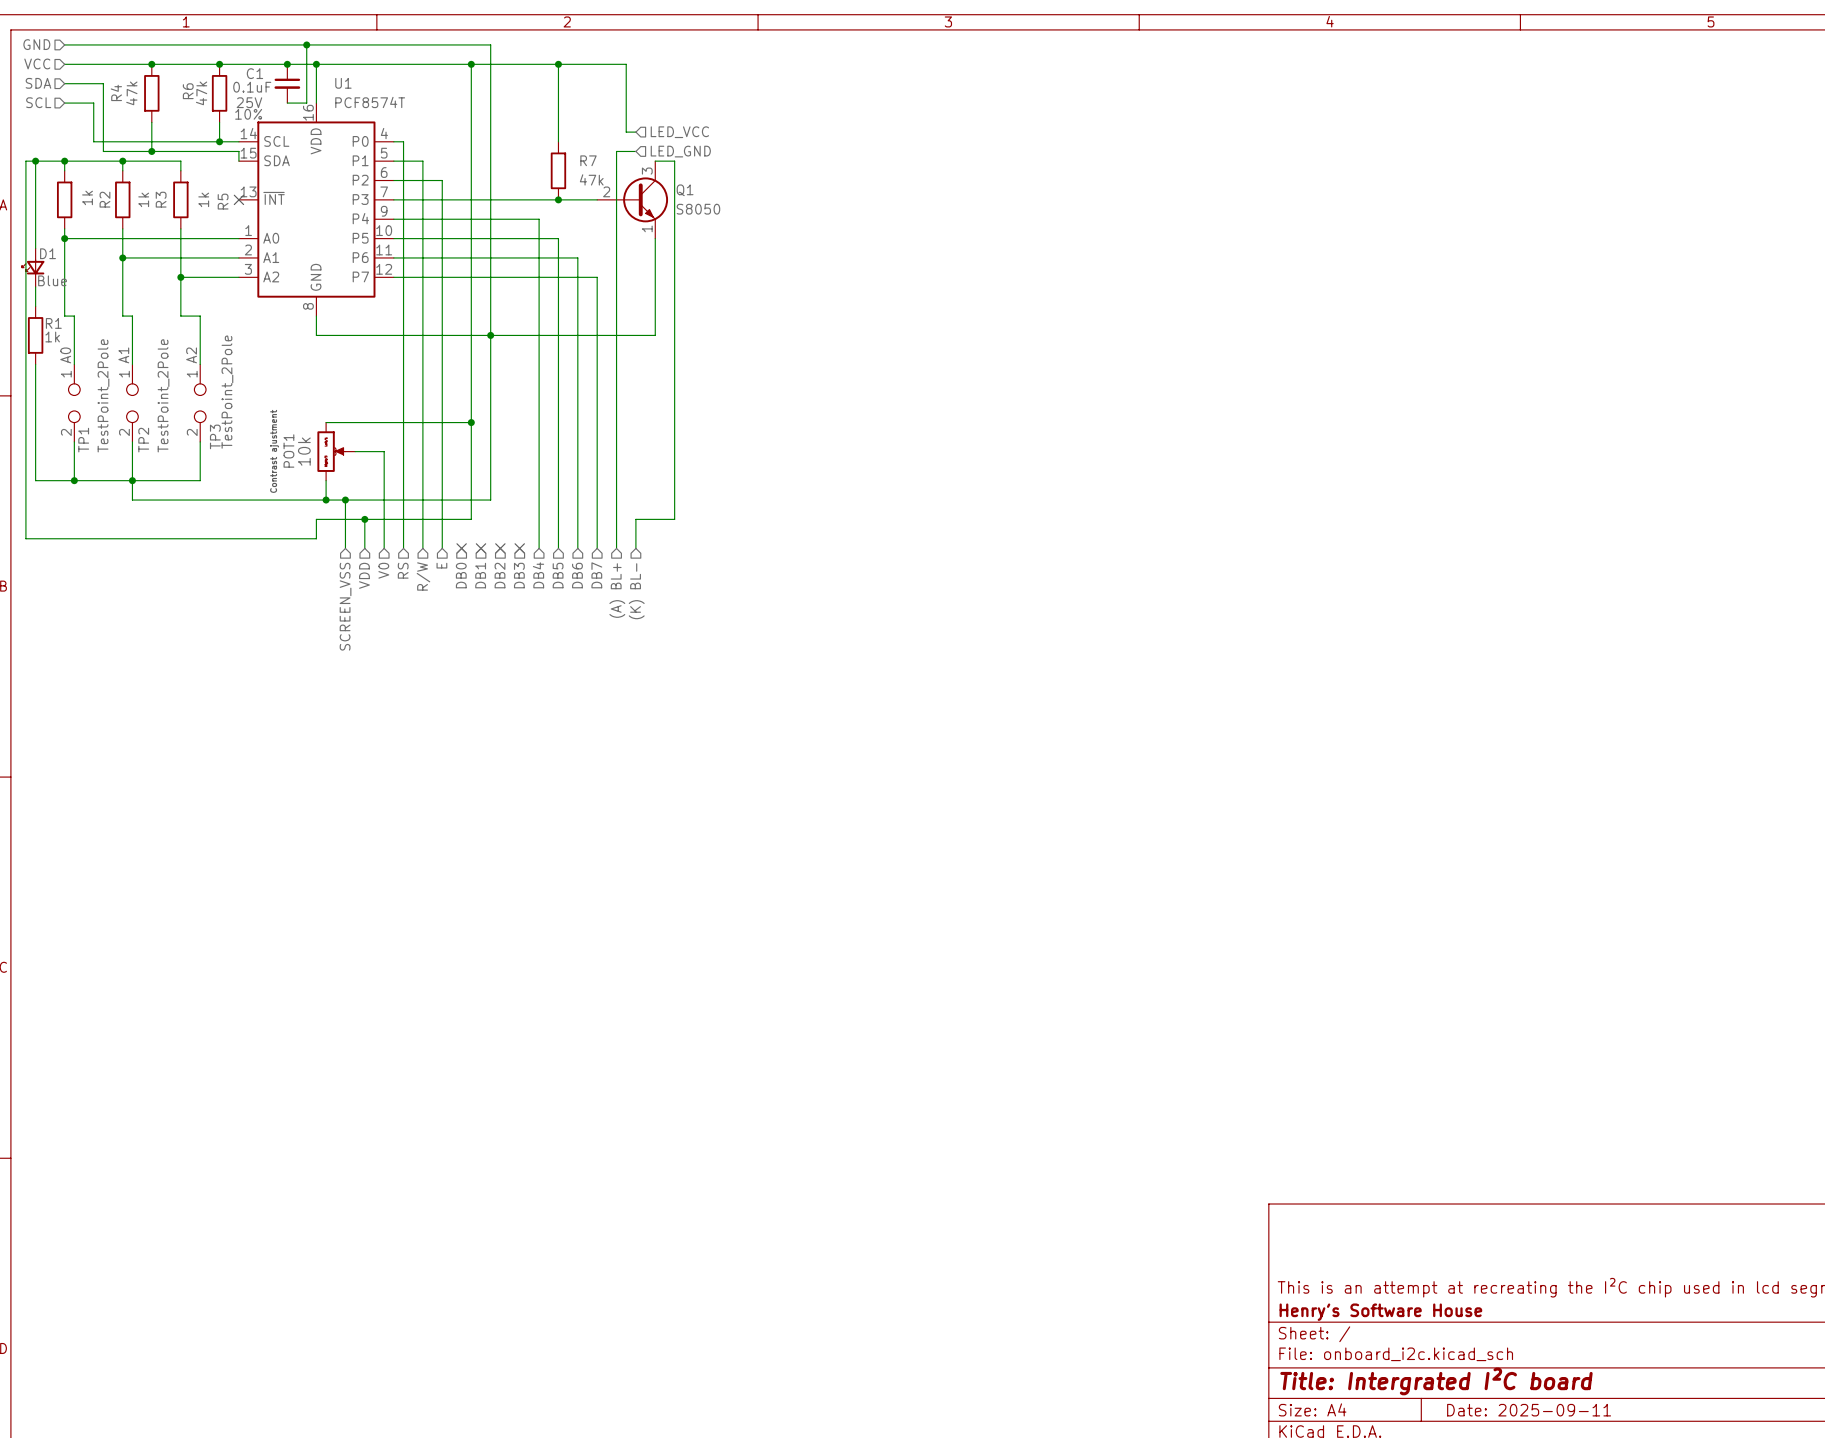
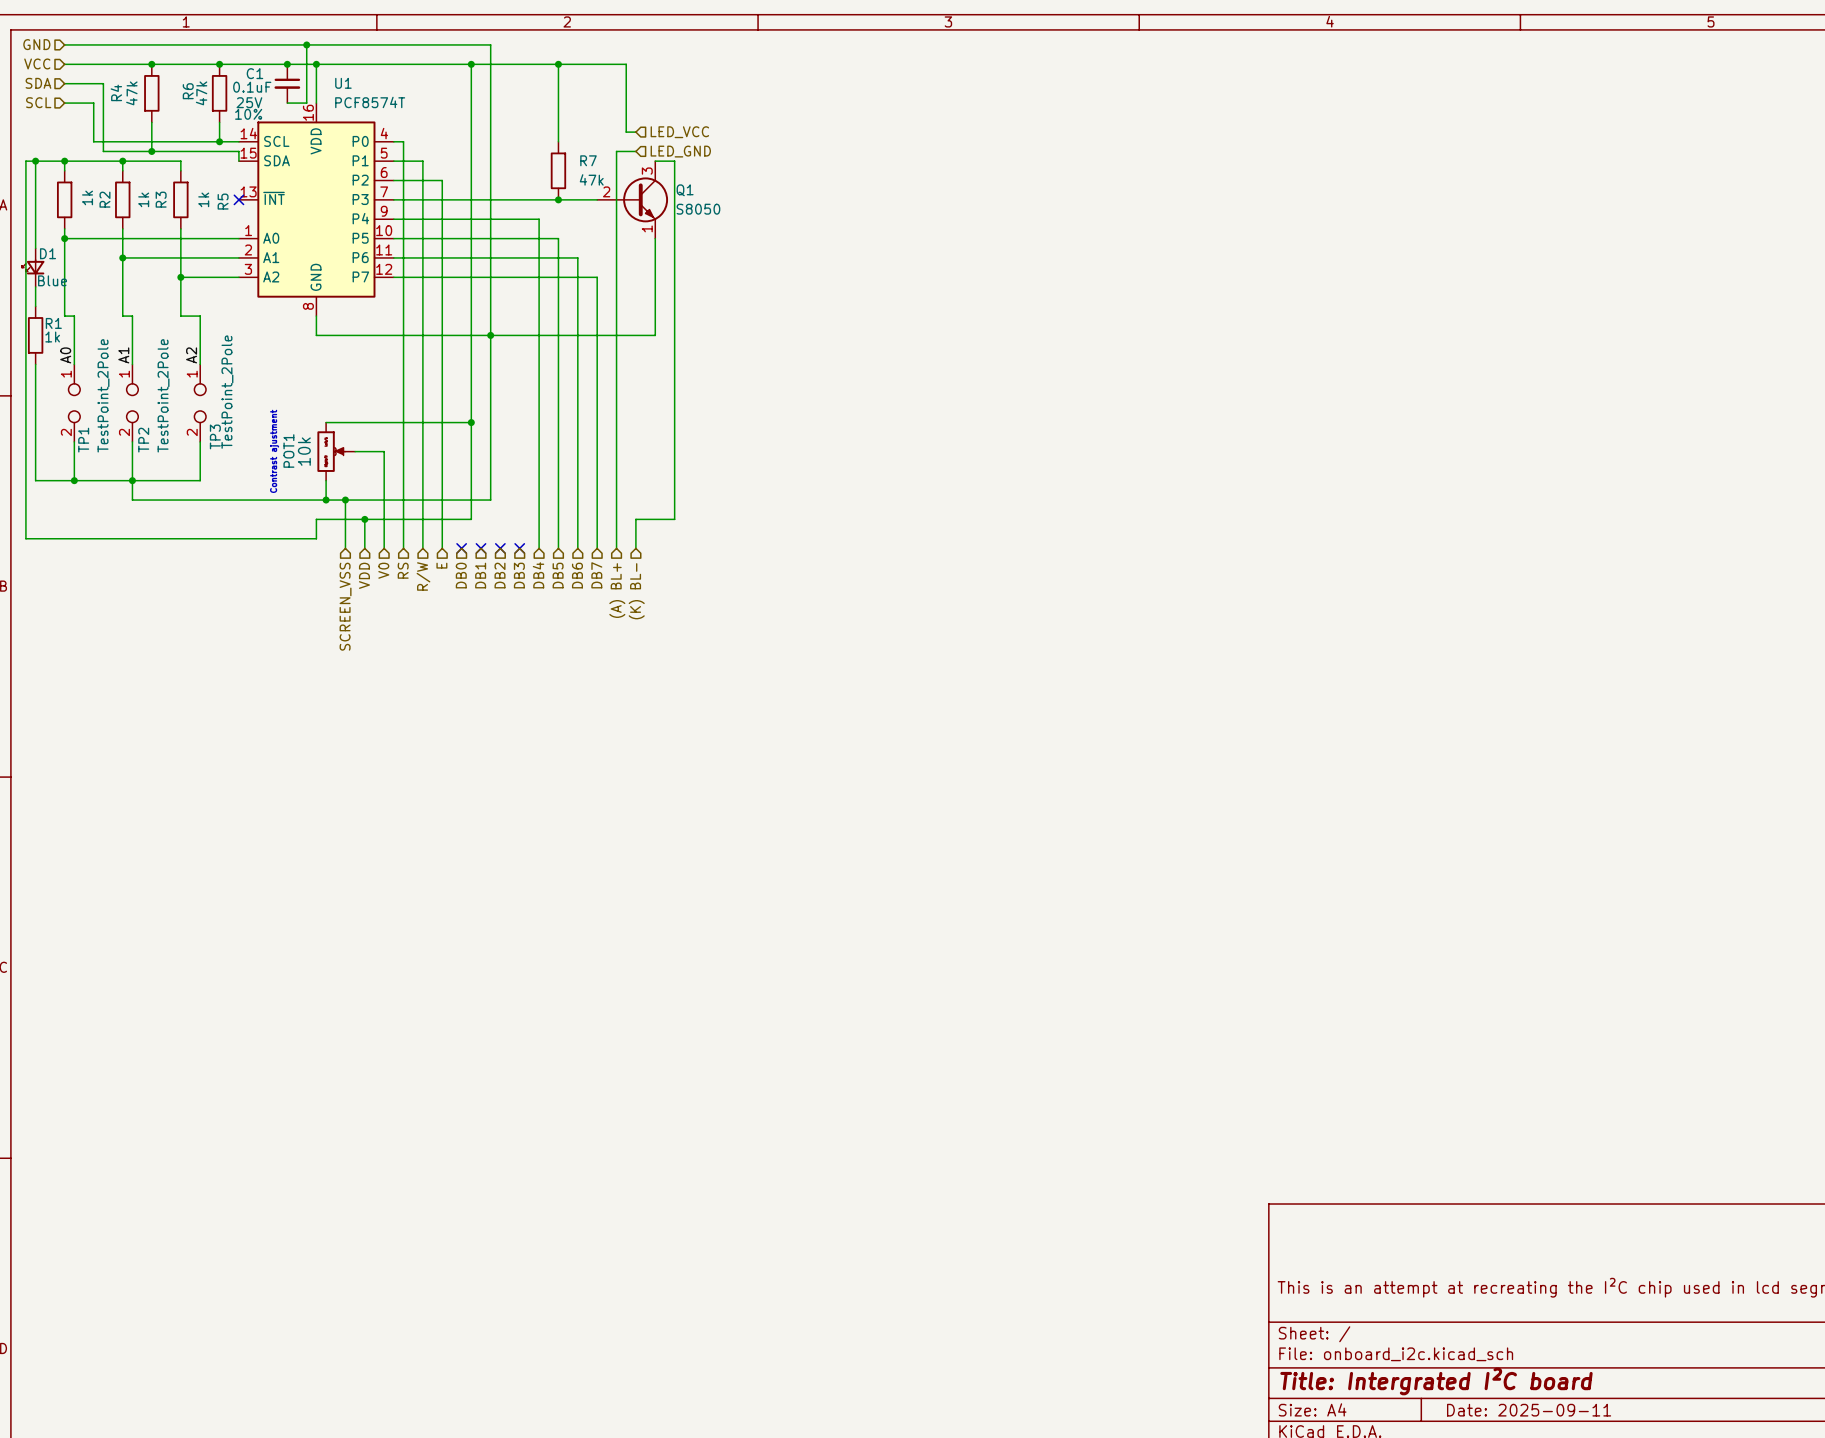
title block: Henry's Software House (1380, 1312) -> none

